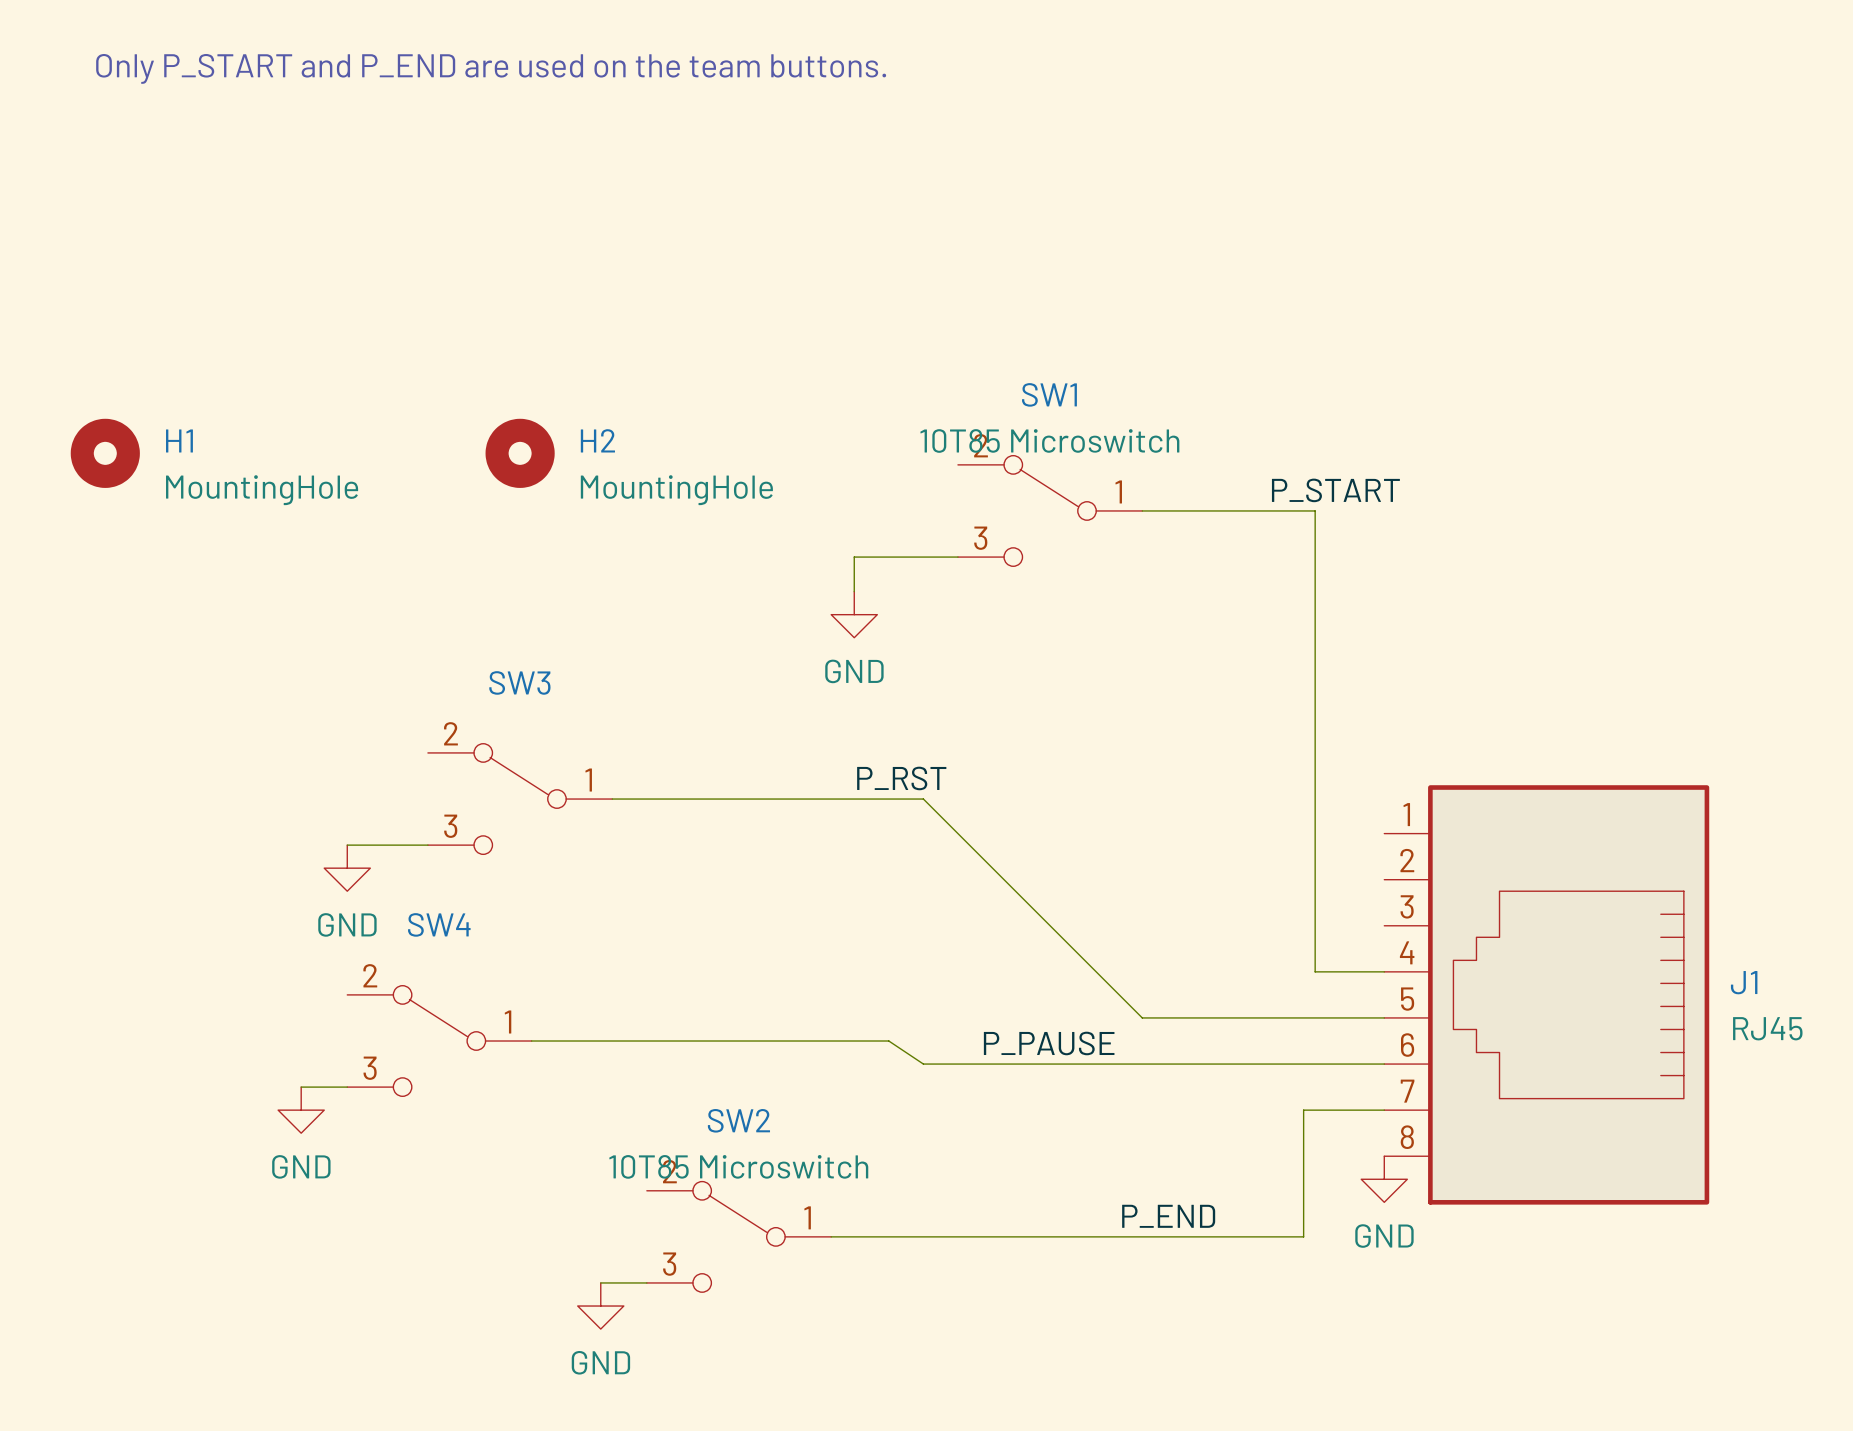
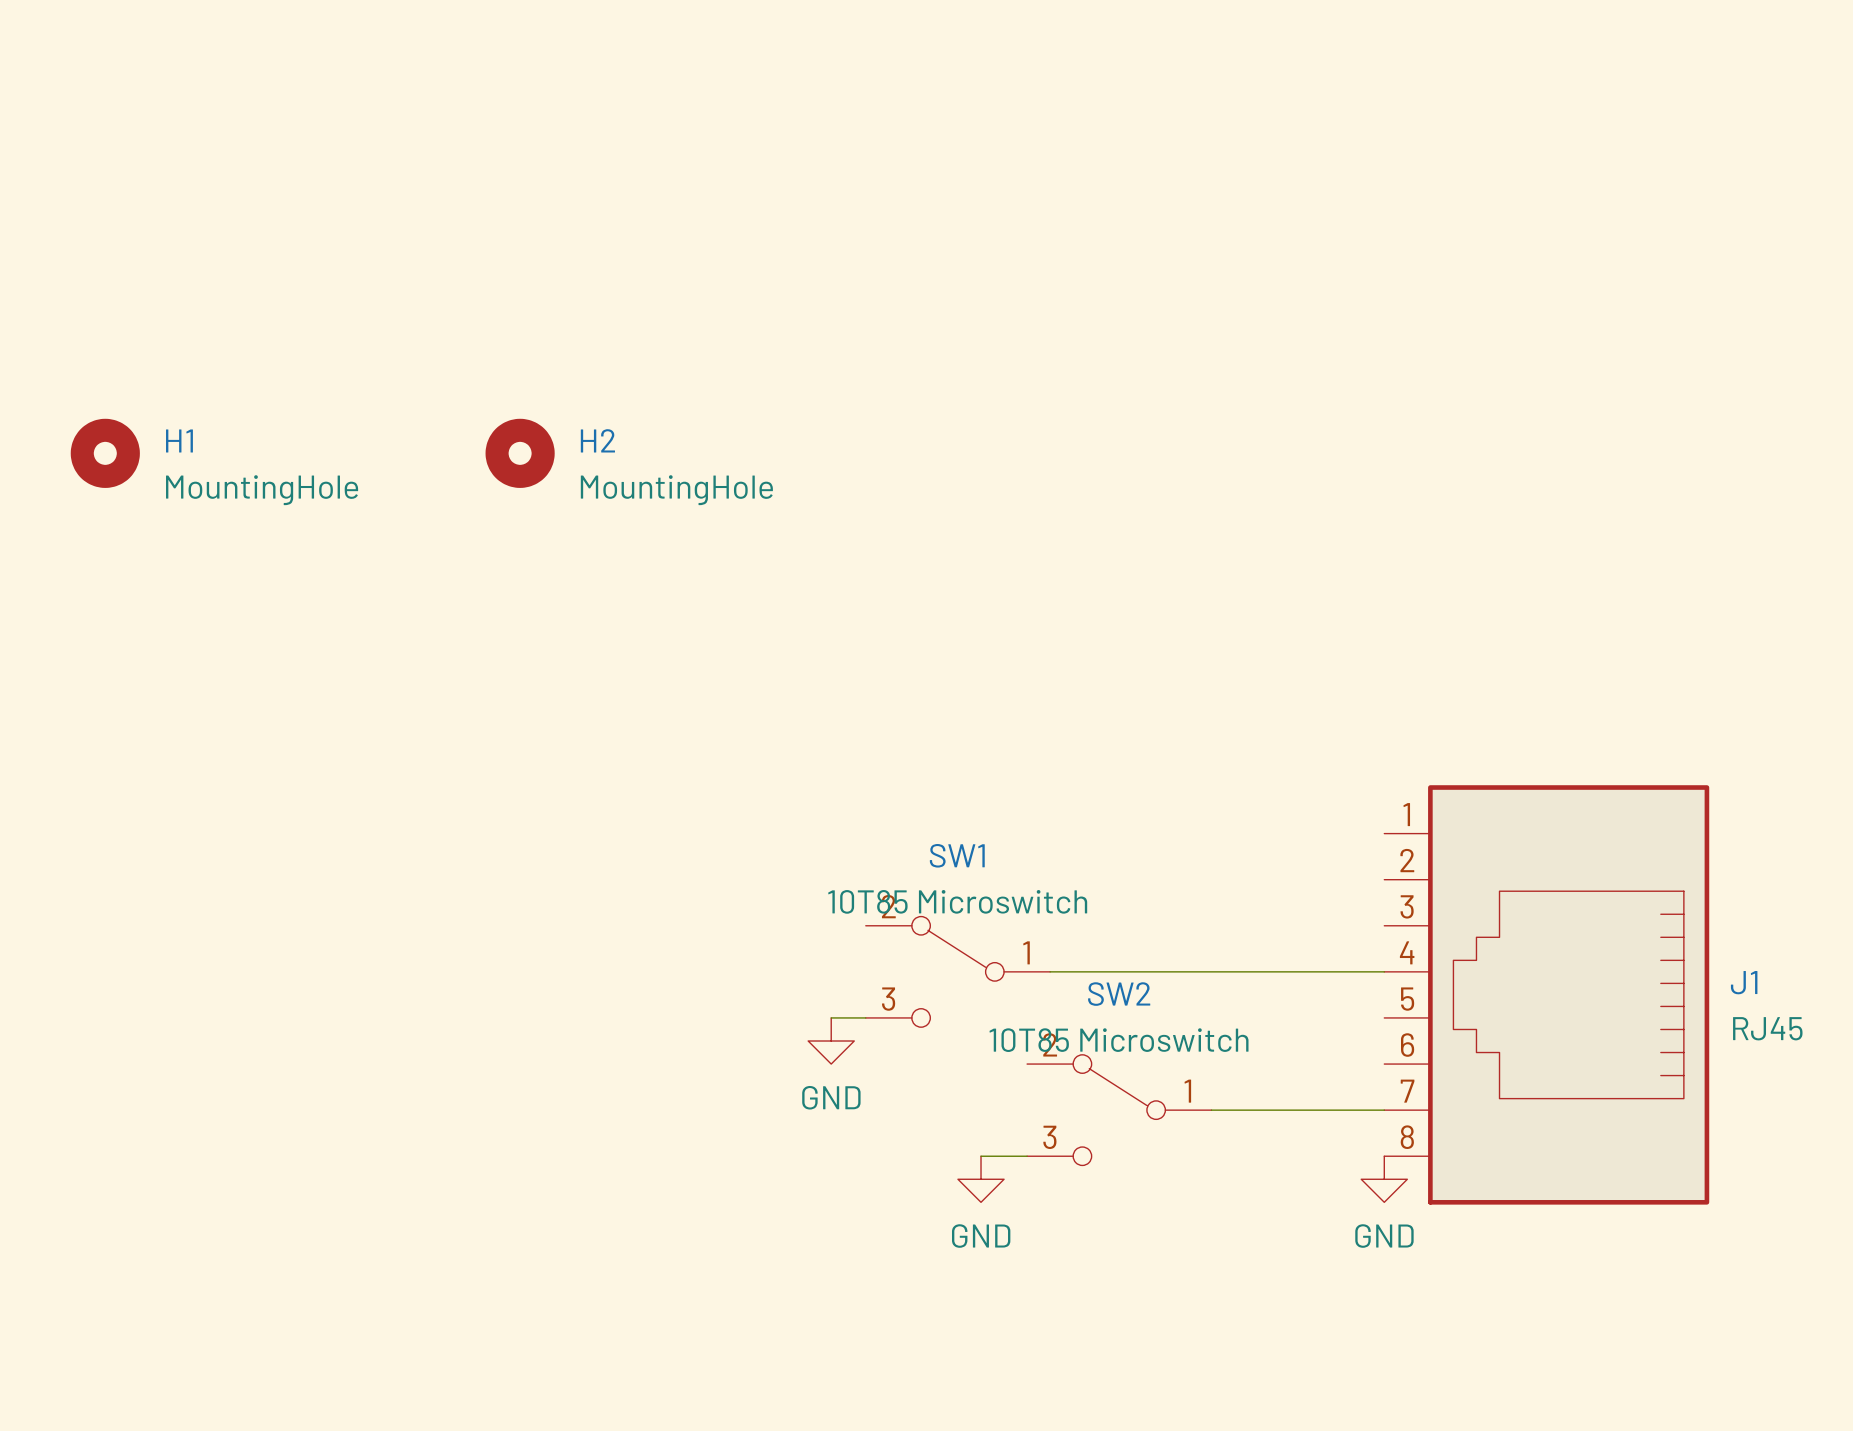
text: Only P_START and P_END are used on the team buttons. (491, 68) -> none
label: P_START (1335, 490) -> none
SW1 position: (1050, 510) -> (957, 971)
wire: (1142, 510) (1315, 510) (1315, 971) -> (1050, 971) (1315, 971)
wire: (957, 557) (854, 557) (854, 591) -> none
power symbol: GND (854, 614) -> none
label: P_RST (901, 778) -> none
SW3: (520, 799) -> none
wire: (612, 799) (923, 799) (1142, 1017) (1384, 1017) -> none
wire: (347, 845) (427, 845) -> none
power symbol: GND (347, 868) -> none
wire: none -> (831, 1017) (865, 1017)
SW4: (439, 1041) -> none
wire: (531, 1041) (888, 1041) (923, 1064) (1384, 1064) -> none
power symbol: none -> GND (831, 1041)
label: P_PAUSE (1049, 1043) -> none
wire: (301, 1087) (347, 1087) -> none
power symbol: GND (301, 1110) -> none
wire: (1303, 1110) (1303, 1236) (831, 1236) -> (1303, 1110) (1211, 1110)
power symbol: none -> GND (981, 1179)
label: P_END (1168, 1216) -> none
SW2 position: (739, 1236) -> (1119, 1110)
wire: (600, 1282) (646, 1282) -> (981, 1156) (1027, 1156)
power symbol: GND (600, 1306) -> none

